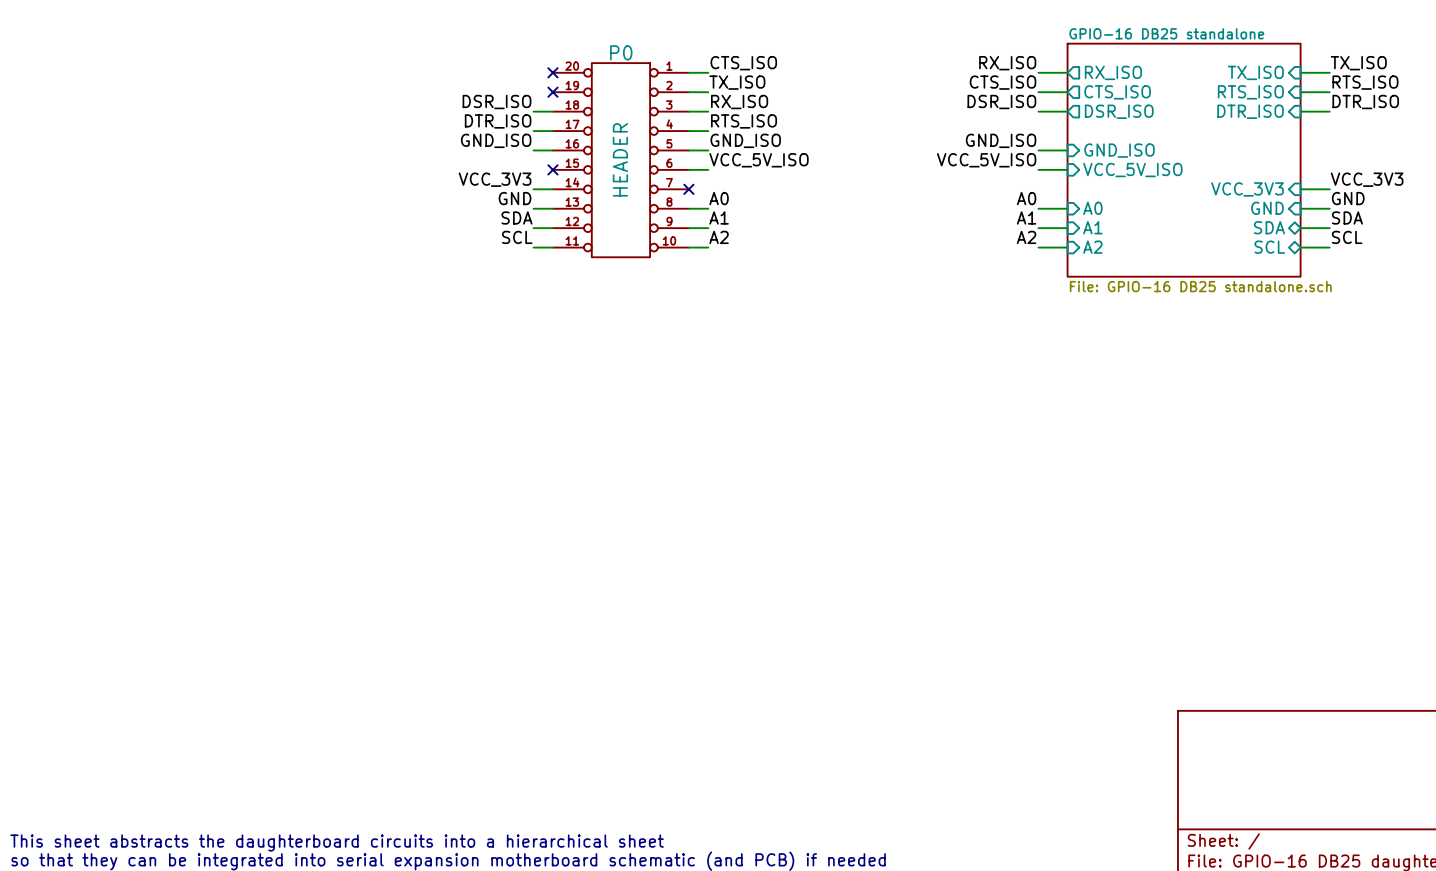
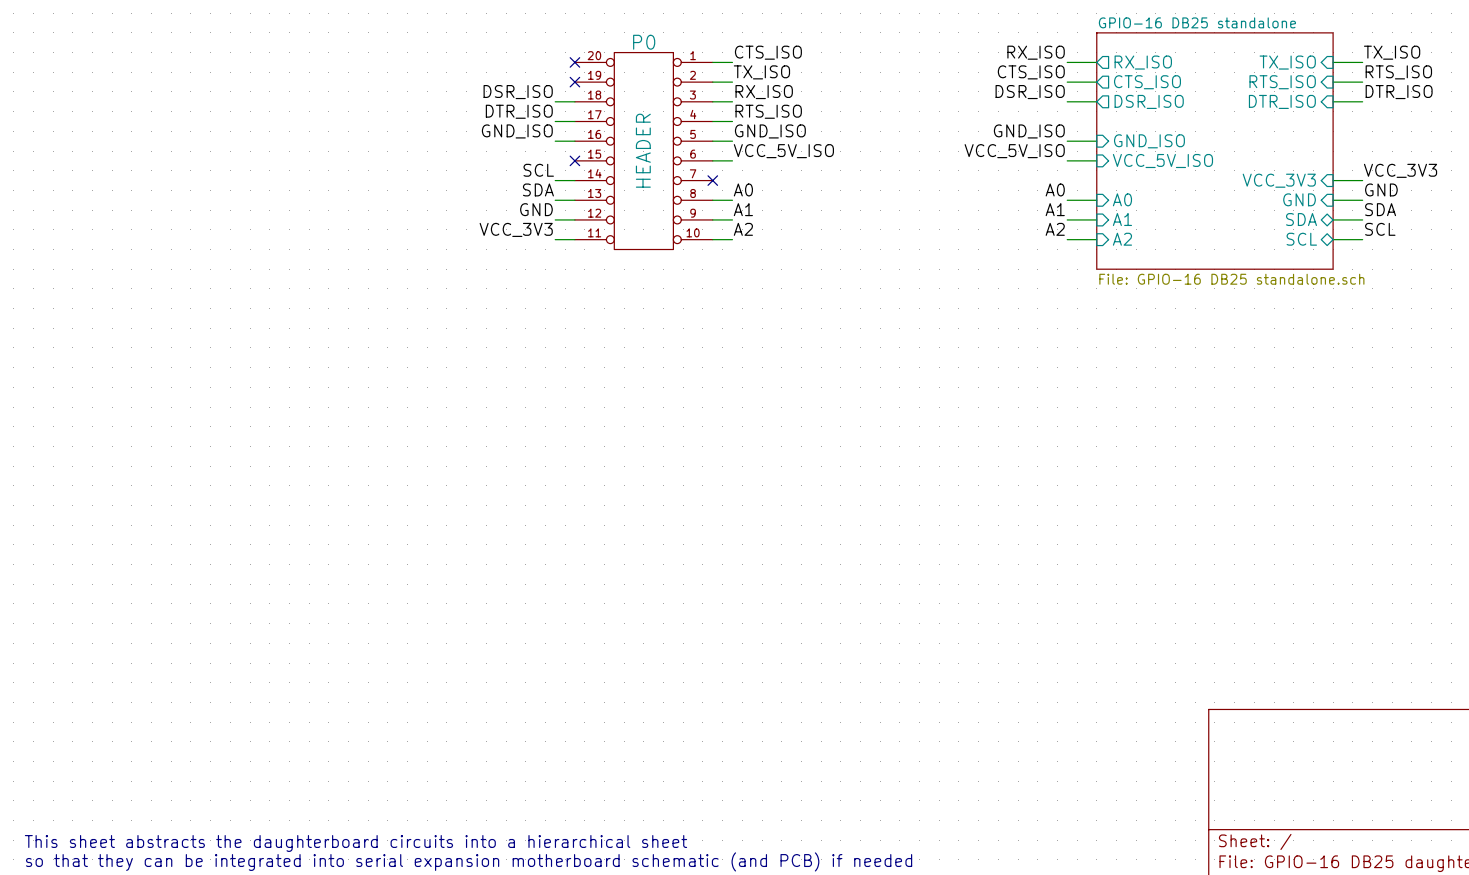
label: VCC_3V3 (495, 179) -> SCL (538, 170)
label: GND (515, 198) -> SDA (538, 189)
label: SDA (516, 217) -> GND (536, 209)
label: SCL (517, 237) -> VCC_3V3 (516, 229)

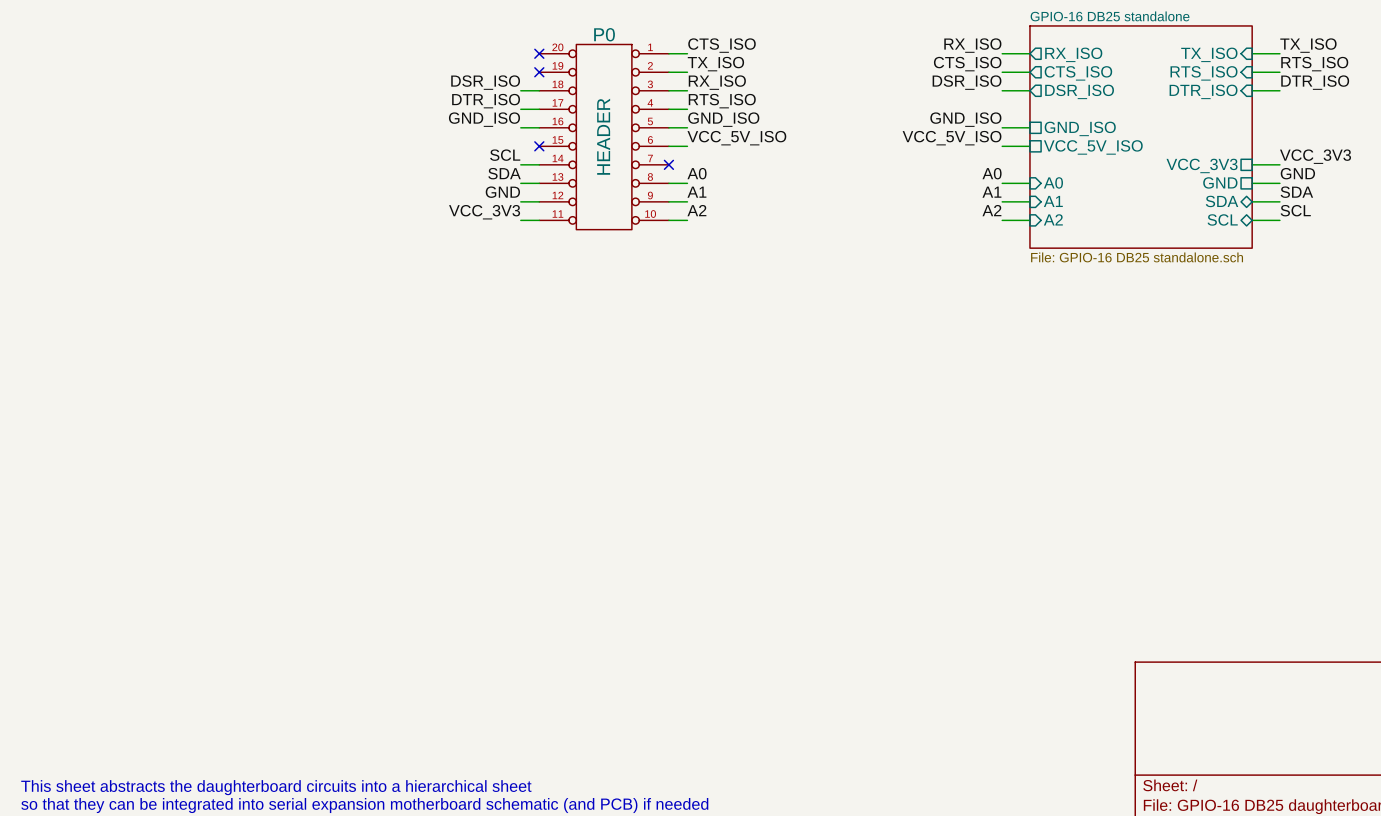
sheet pin shape: input (1149, 141) -> passive (1080, 128)
sheet pin shape: input (1162, 161) -> passive (1093, 147)
sheet pin shape: input (1279, 180) -> passive (1202, 165)
sheet pin shape: input (1299, 199) -> passive (1220, 182)

